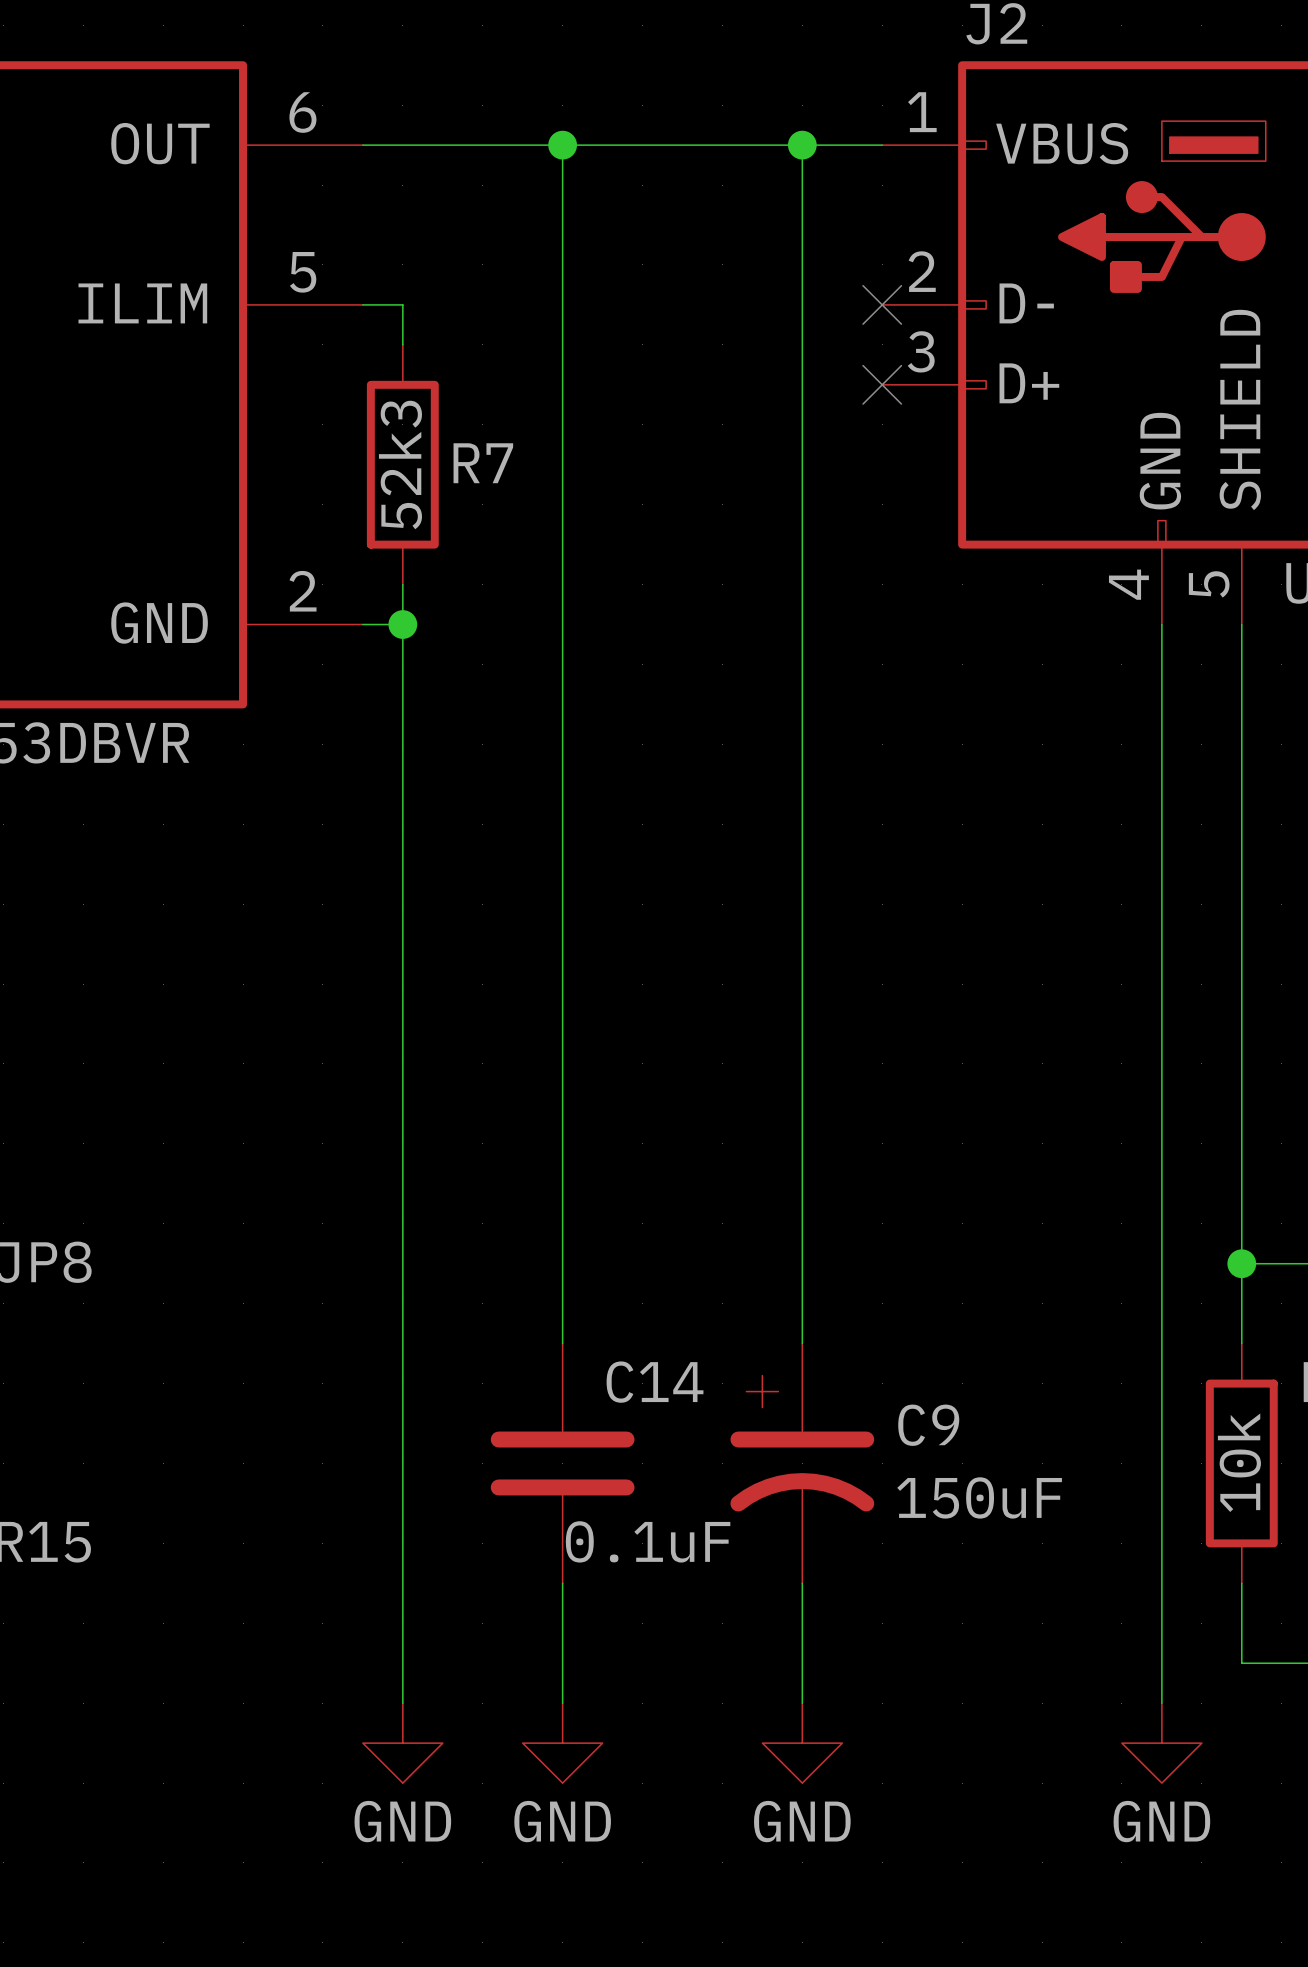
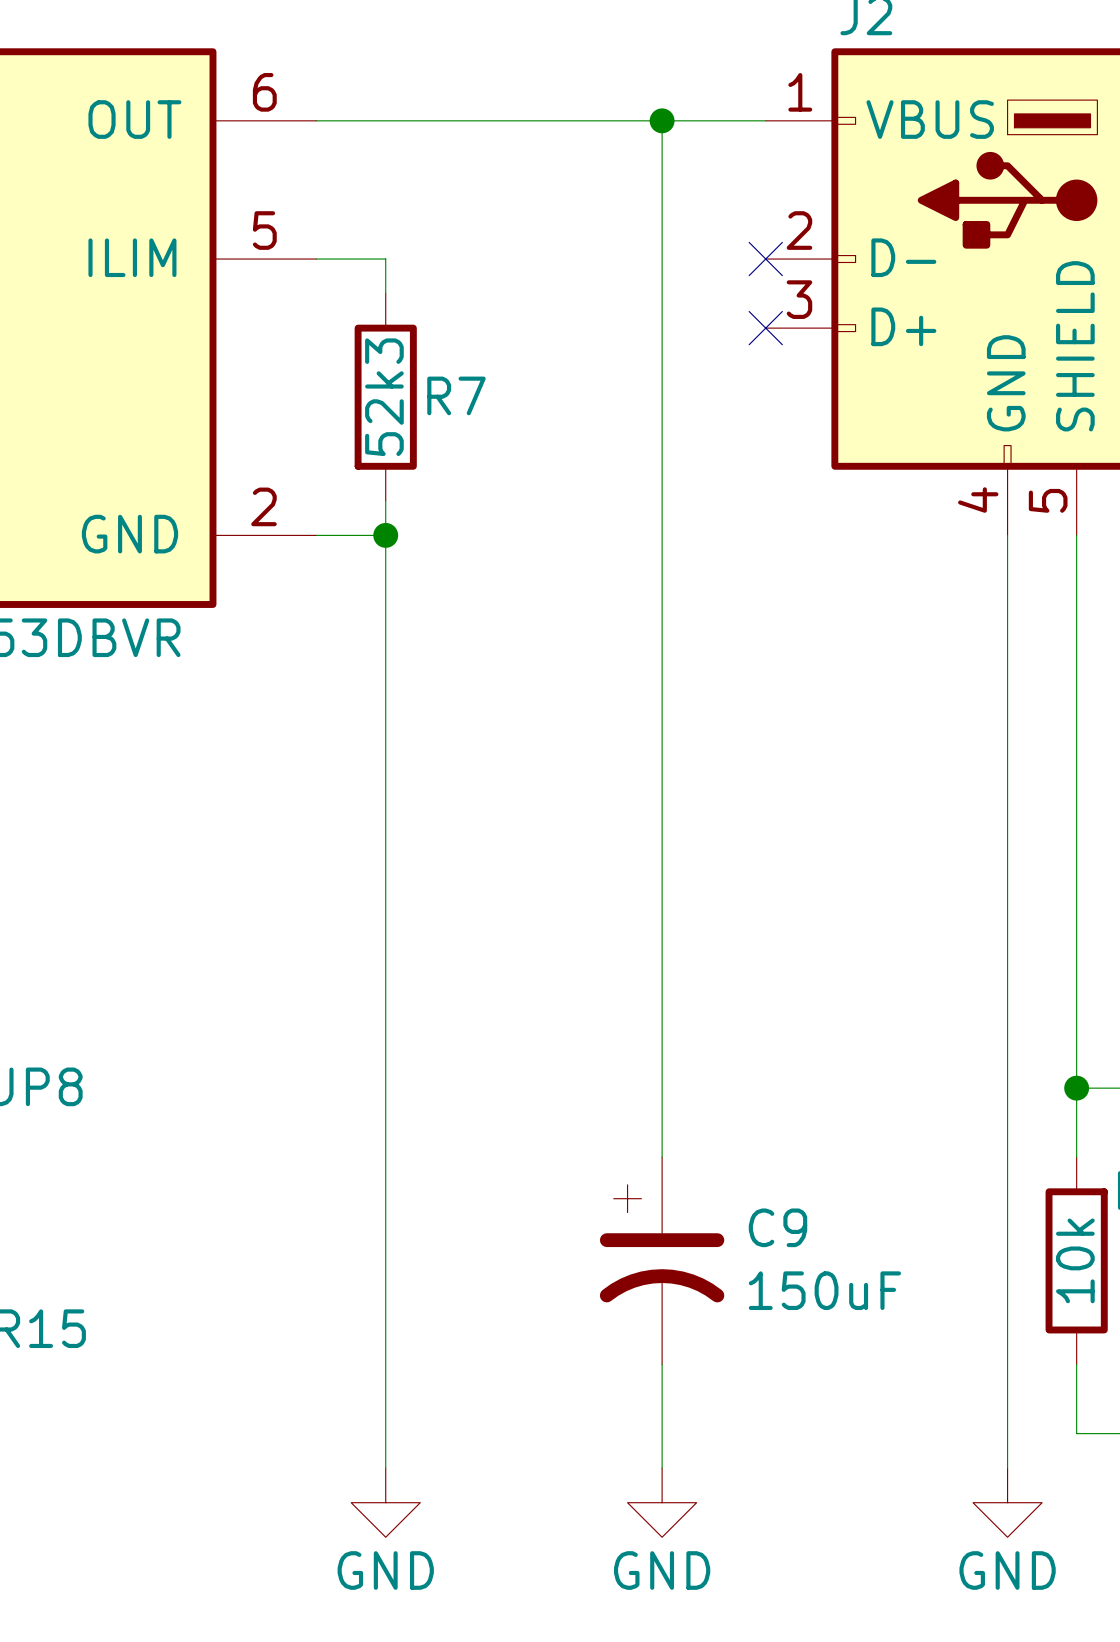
wire: (562, 145) (562, 1343) -> none
junction: (562, 145) -> none
wire: (802, 145) (802, 1343) -> (662, 120) (662, 1157)
junction position: (802, 145) -> (662, 120)
wire: (402, 304) (402, 344) -> (351, 259) (385, 259) (385, 293)
R7 position: (402, 464) -> (385, 397)
wire: (402, 584) (402, 1703) -> (385, 500) (385, 1468)
wire: none -> (351, 535) (385, 535)
junction position: (402, 624) -> (385, 535)
C14: 0.1uF (562, 1463) -> none
C9 position: (802, 1463) -> (662, 1260)
wire: (562, 1583) (562, 1703) -> none
wire: (802, 1583) (802, 1703) -> (662, 1364) (662, 1468)
power symbol position: GND (402, 1743) -> GND (385, 1502)
power symbol: GND (562, 1743) -> none
power symbol position: GND (802, 1743) -> GND (662, 1502)

